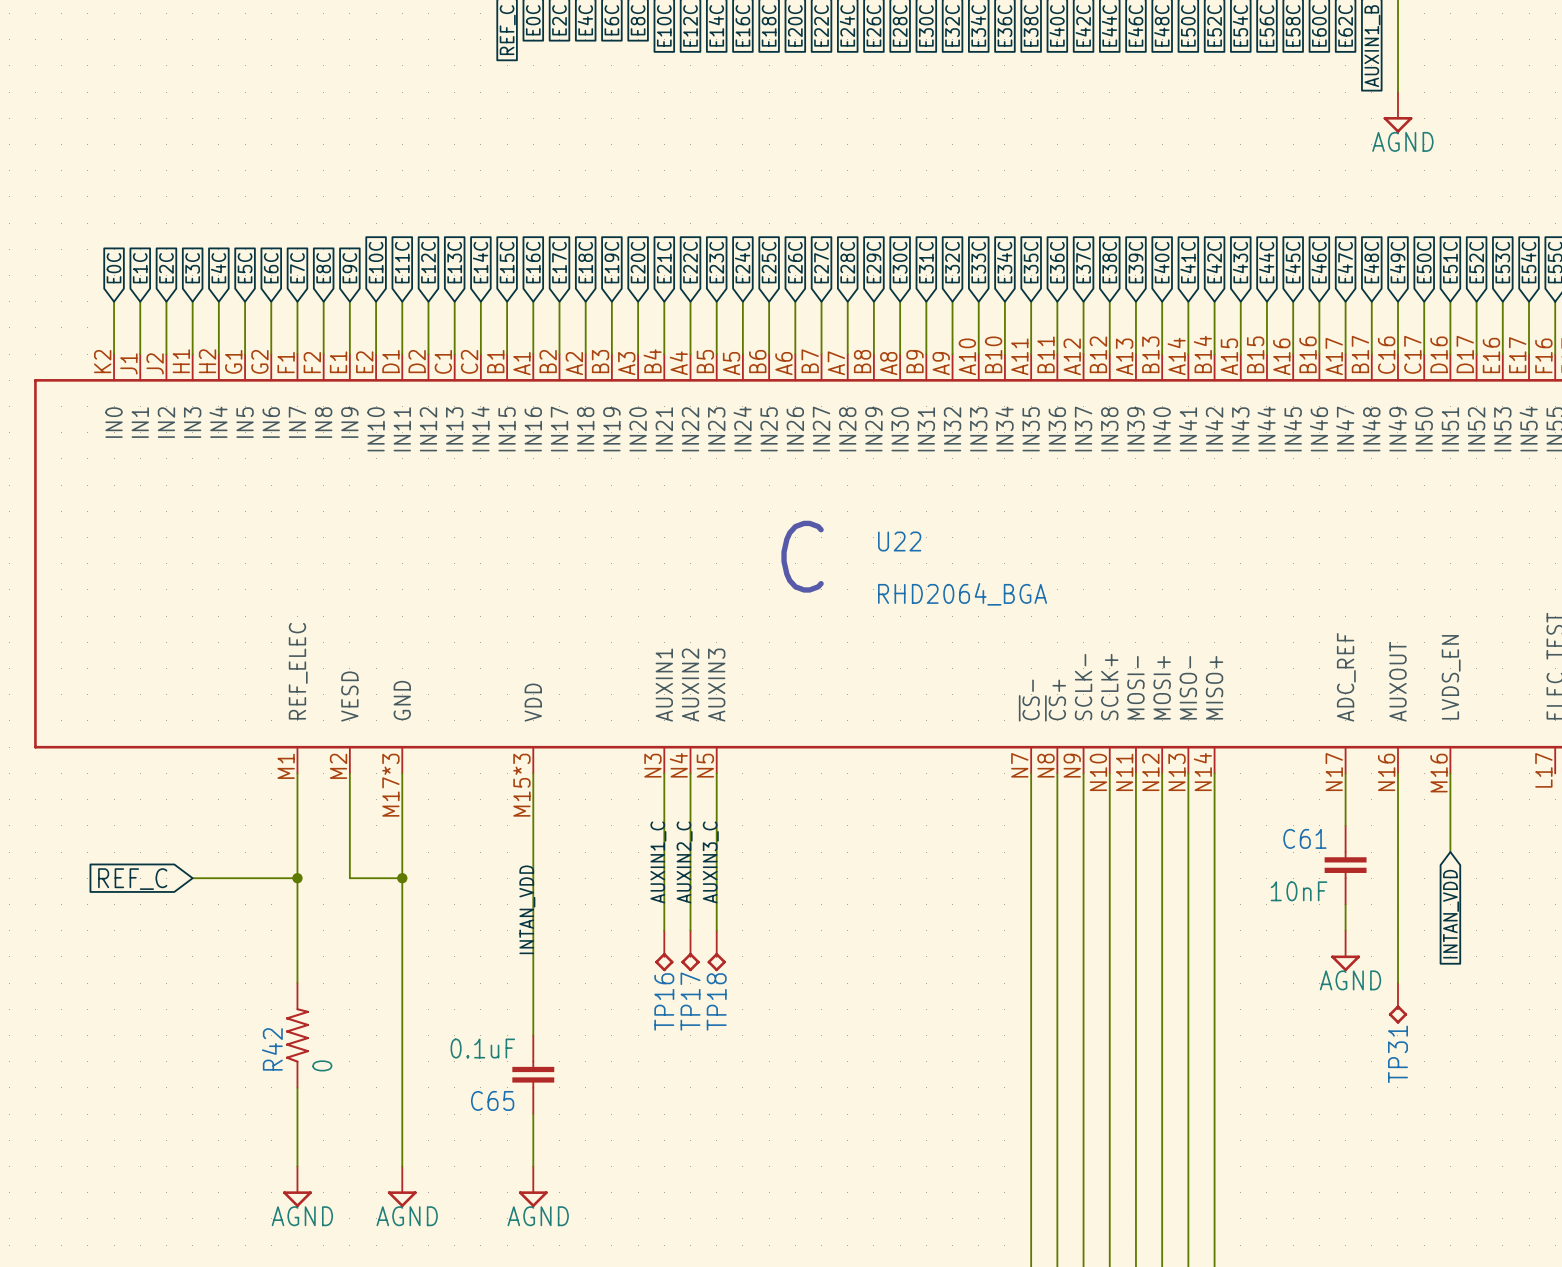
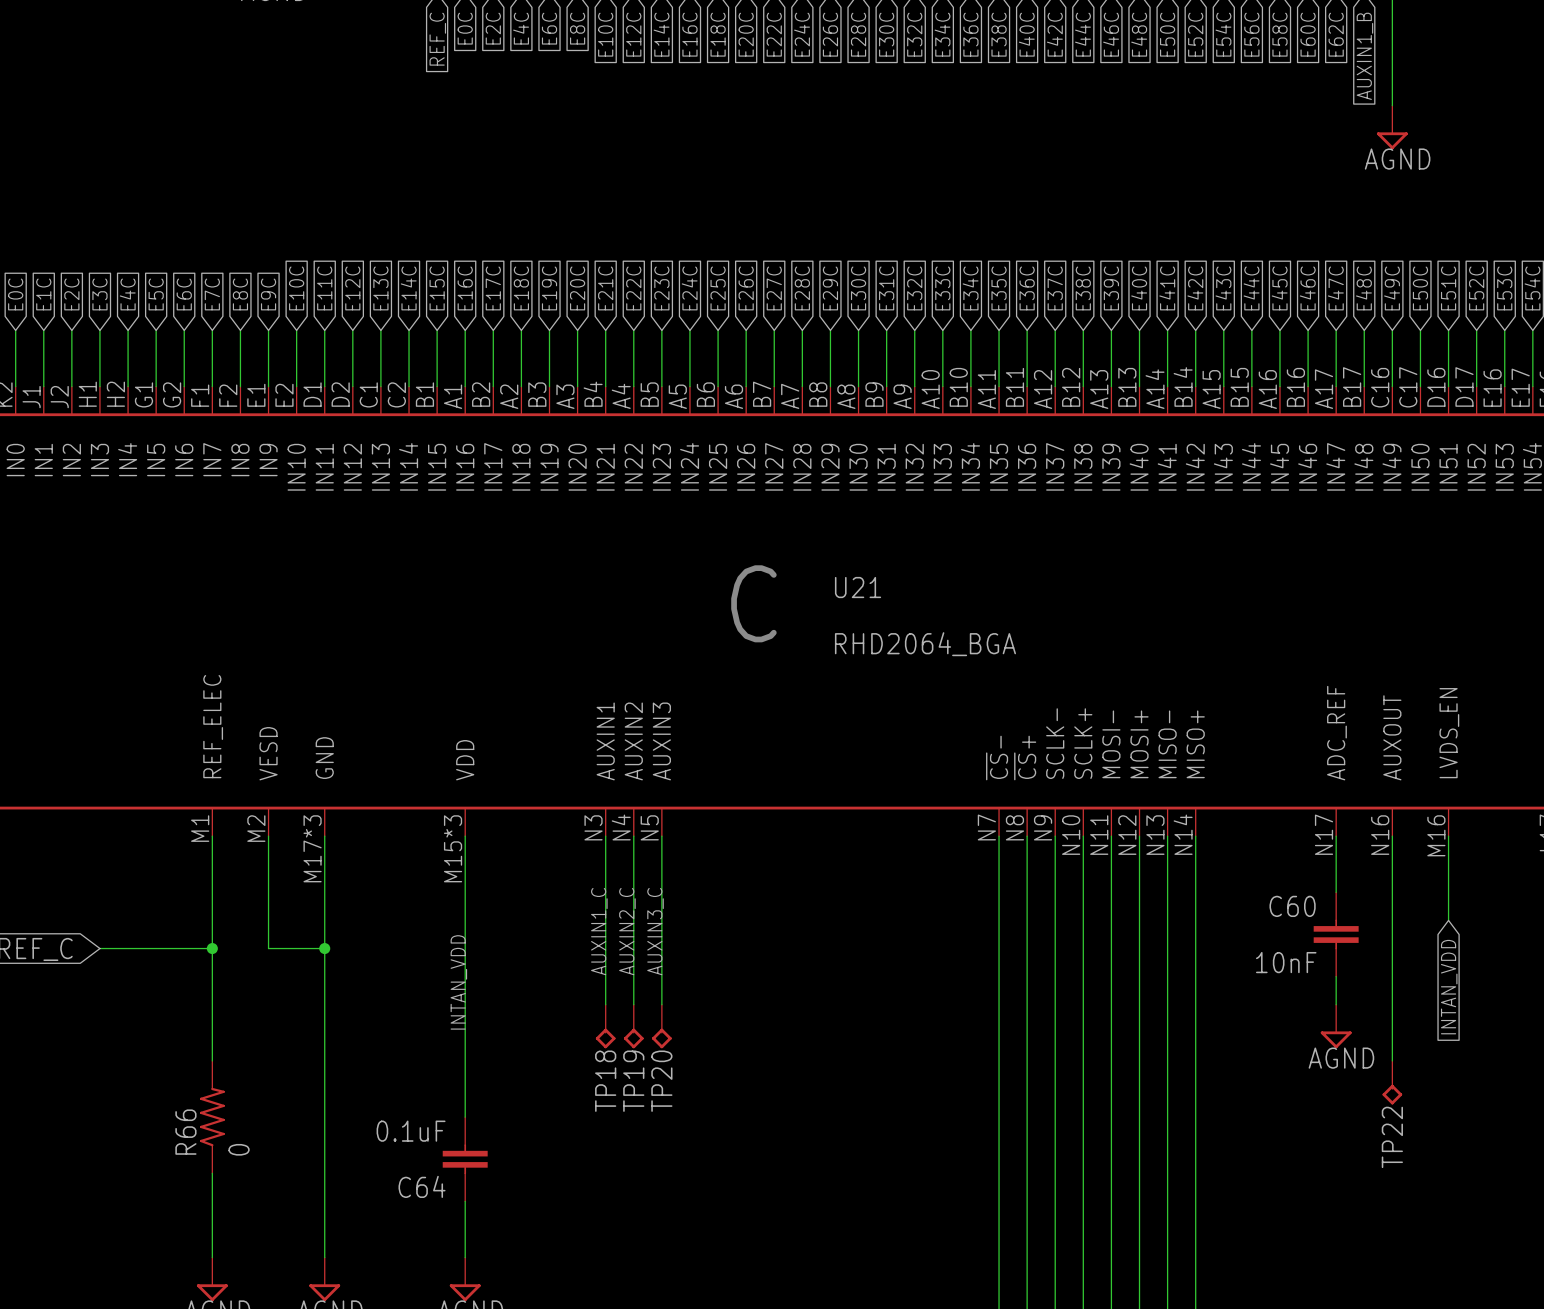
U22 name: U22 (899, 541) -> U21 (858, 587)
C61 name: C61 (1304, 838) -> C60 (1292, 906)
TP16 name: TP16 (664, 1001) -> TP18 (605, 1081)
TP17 name: TP17 (690, 1001) -> TP19 (633, 1081)
TP18 name: TP18 (716, 1001) -> TP20 (661, 1081)
R42 name: R42 (272, 1049) -> R66 (185, 1132)
TP31 name: TP31 (1397, 1054) -> TP22 (1392, 1137)
C65 name: C65 (492, 1100) -> C64 (422, 1186)

